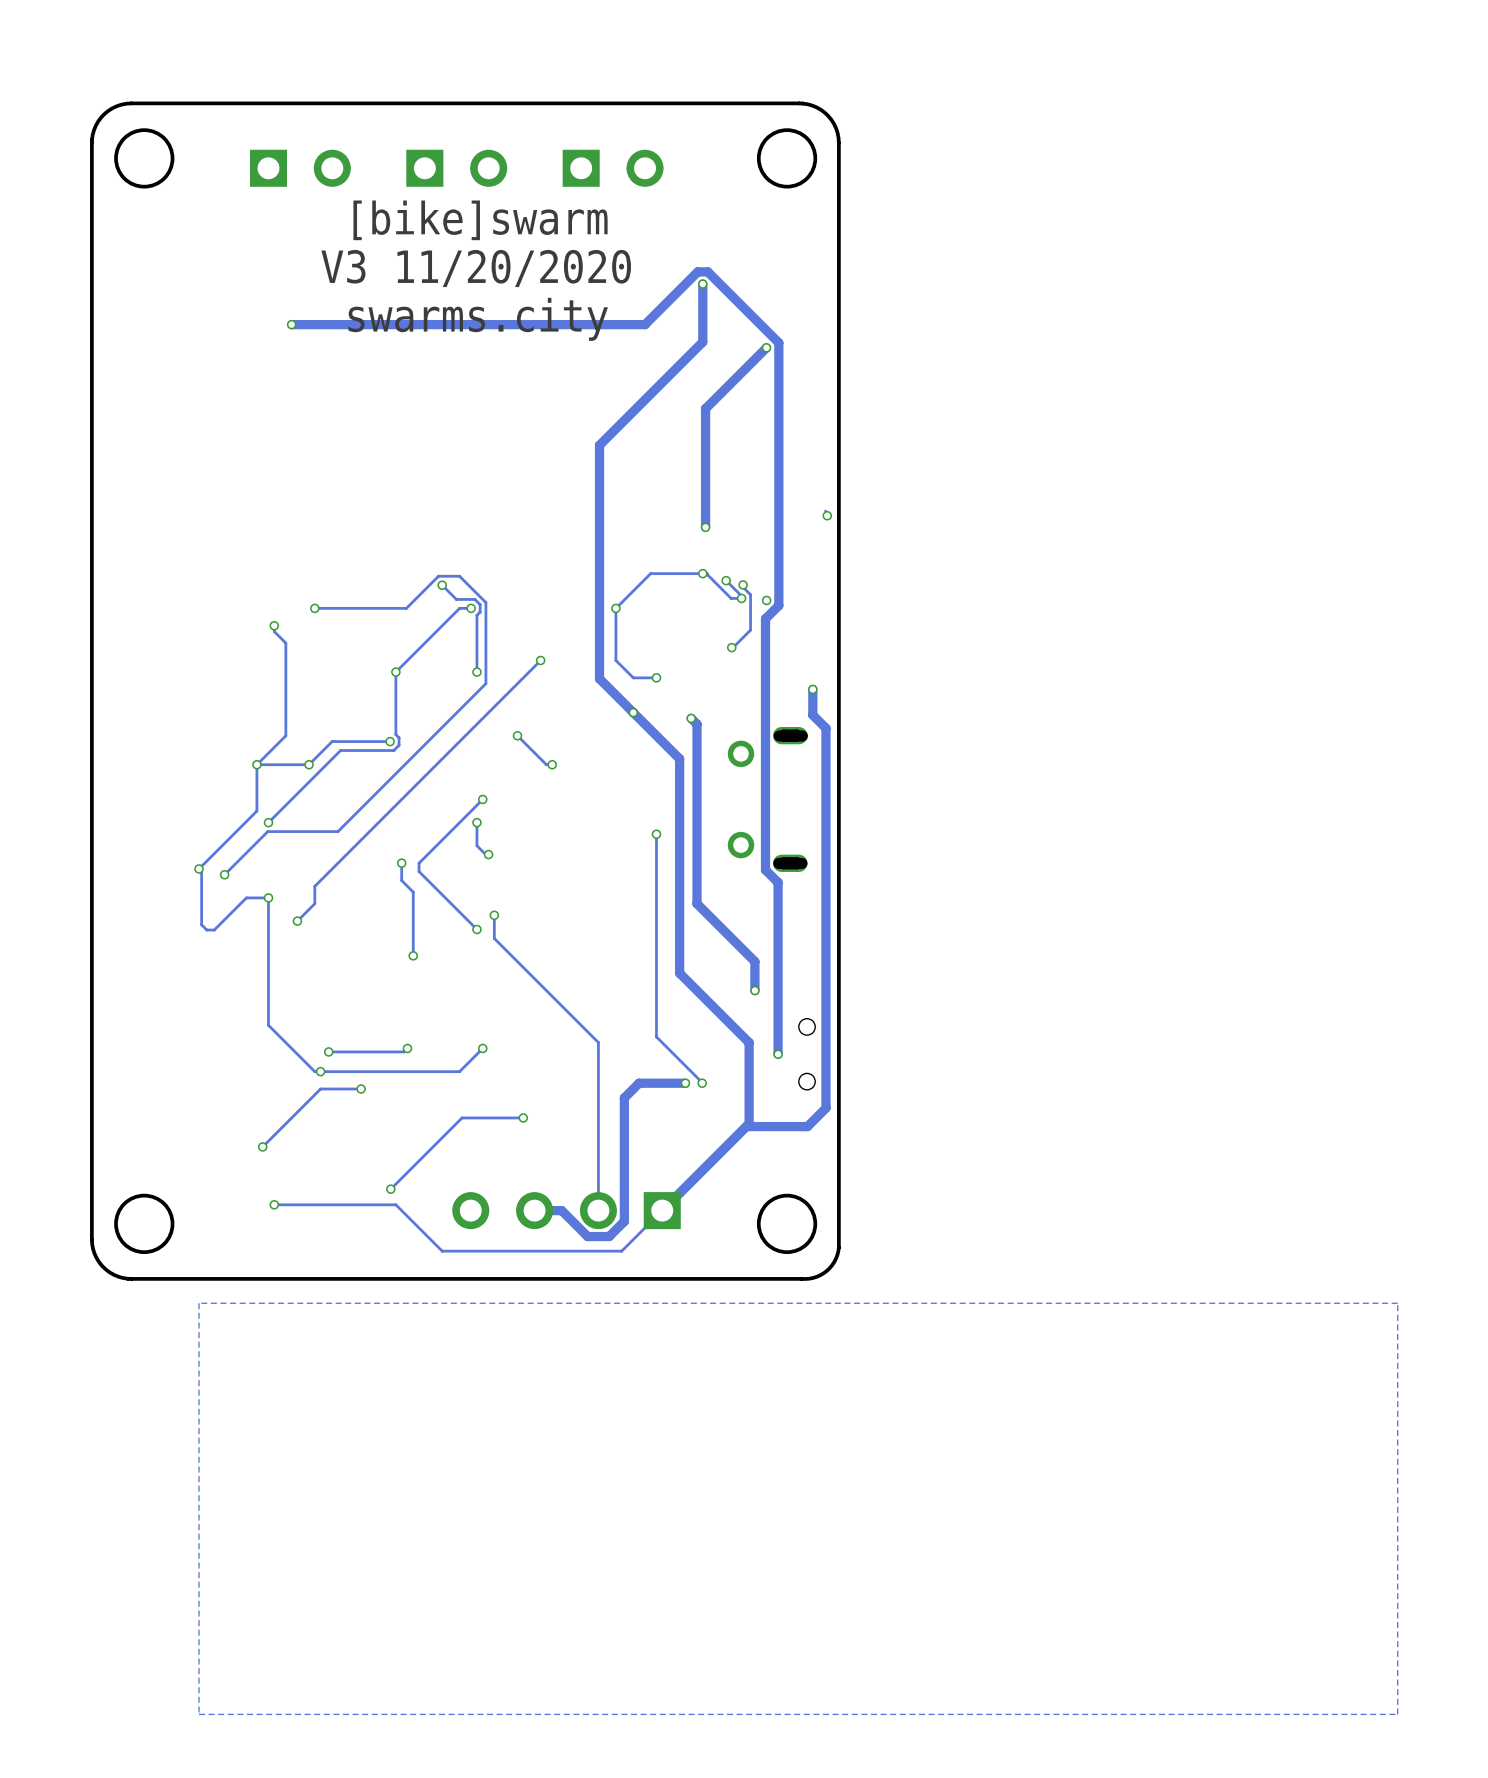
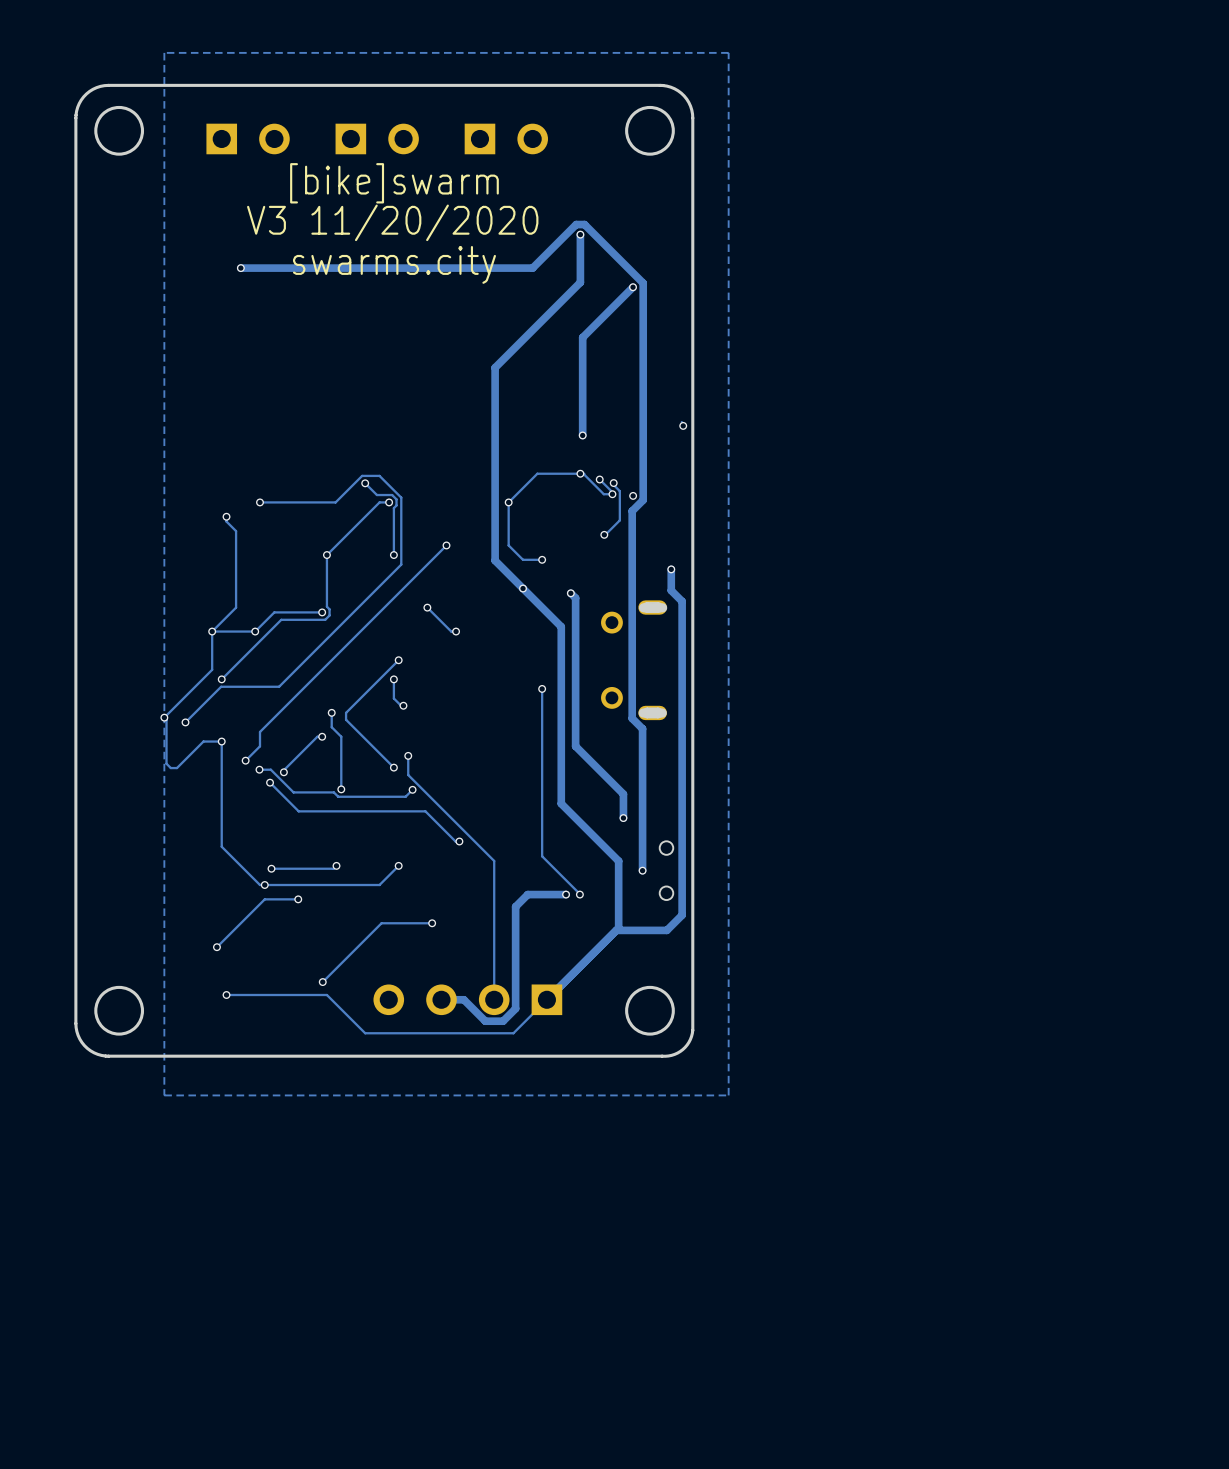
zone outline: none -> (728, 52) (164, 52) (164, 1095) (728, 1095) (728, 52)
track: none -> (322, 736) (317, 736) (283, 772)
via: none -> (322, 736)
track: none -> (259, 769) (270, 769) (293, 792) (333, 792) (338, 796) (405, 796) (413, 789)
via: none -> (259, 769)
via: none -> (283, 772)
track: none -> (270, 782) (298, 811) (425, 811) (455, 841) (459, 841)
via: none -> (270, 782)
via: none -> (412, 789)
via: none -> (459, 841)
zone outline: (1397, 1303) (199, 1303) (199, 1714) (1397, 1714) (1397, 1303) -> none

